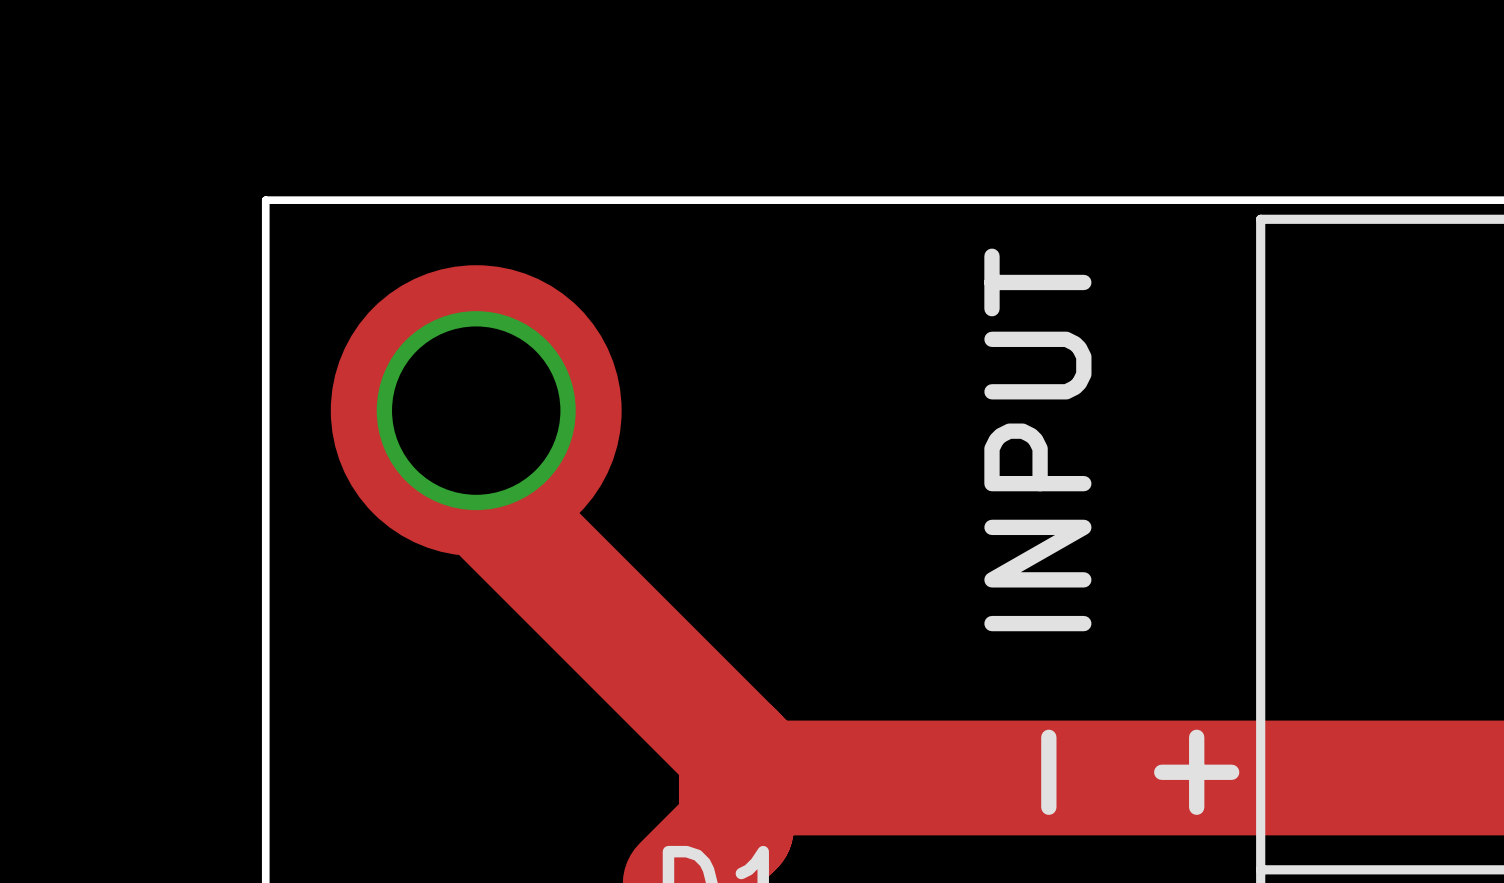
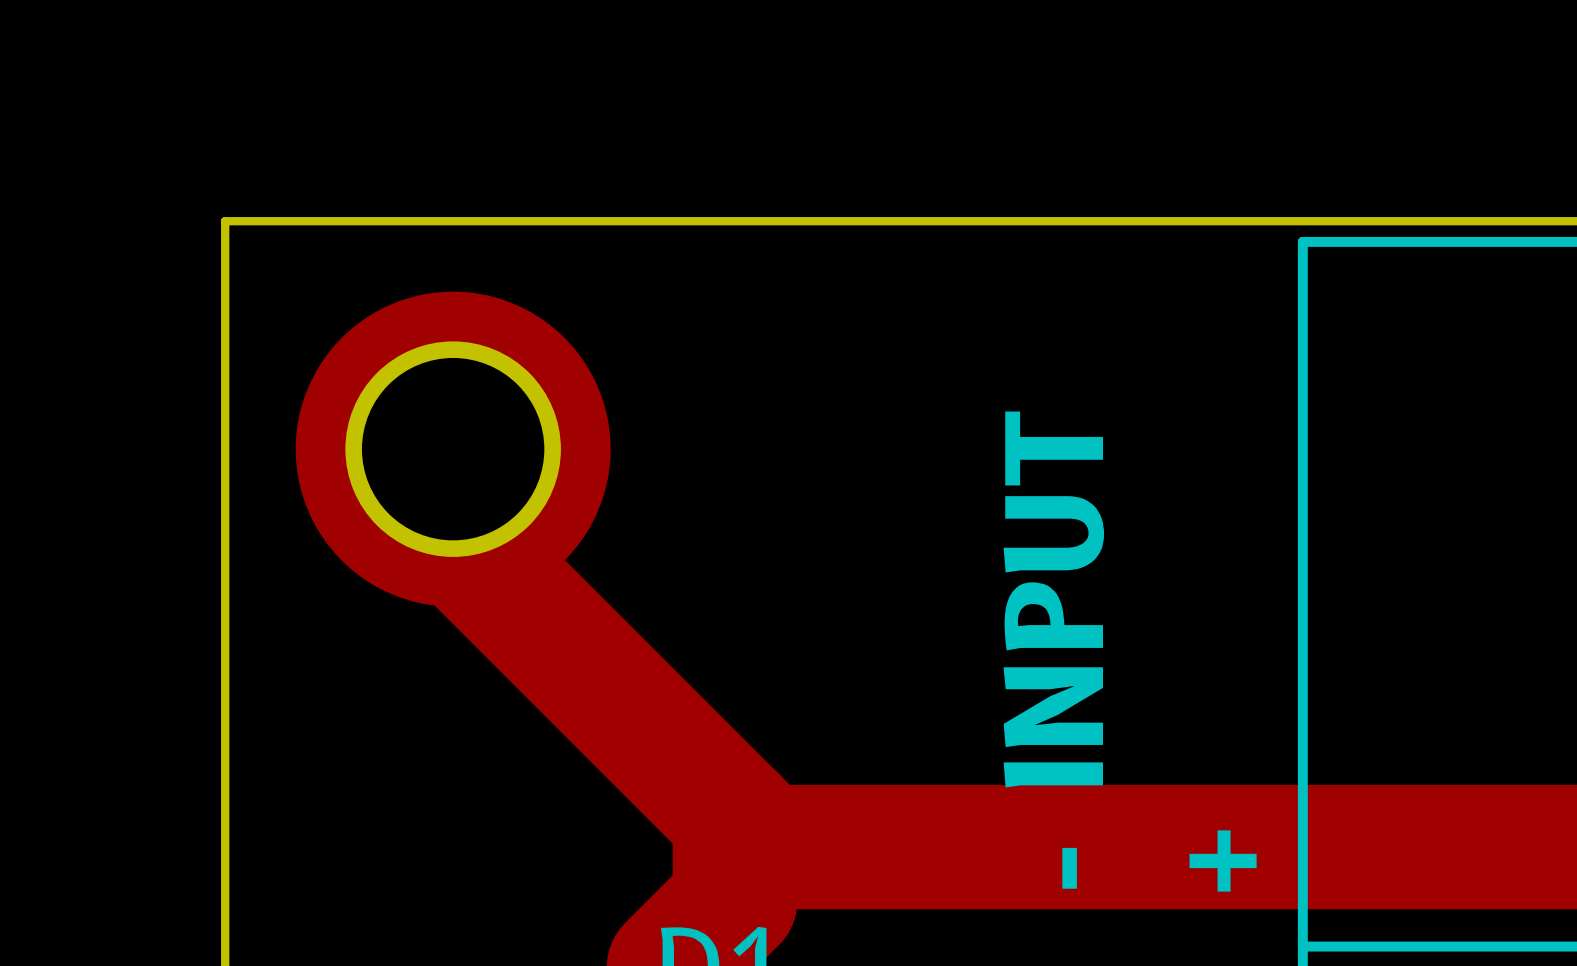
text position: - INPUT (1037, 531) -> - INPUT (1053, 650)
text position: + (1196, 772) -> + (1223, 860)

